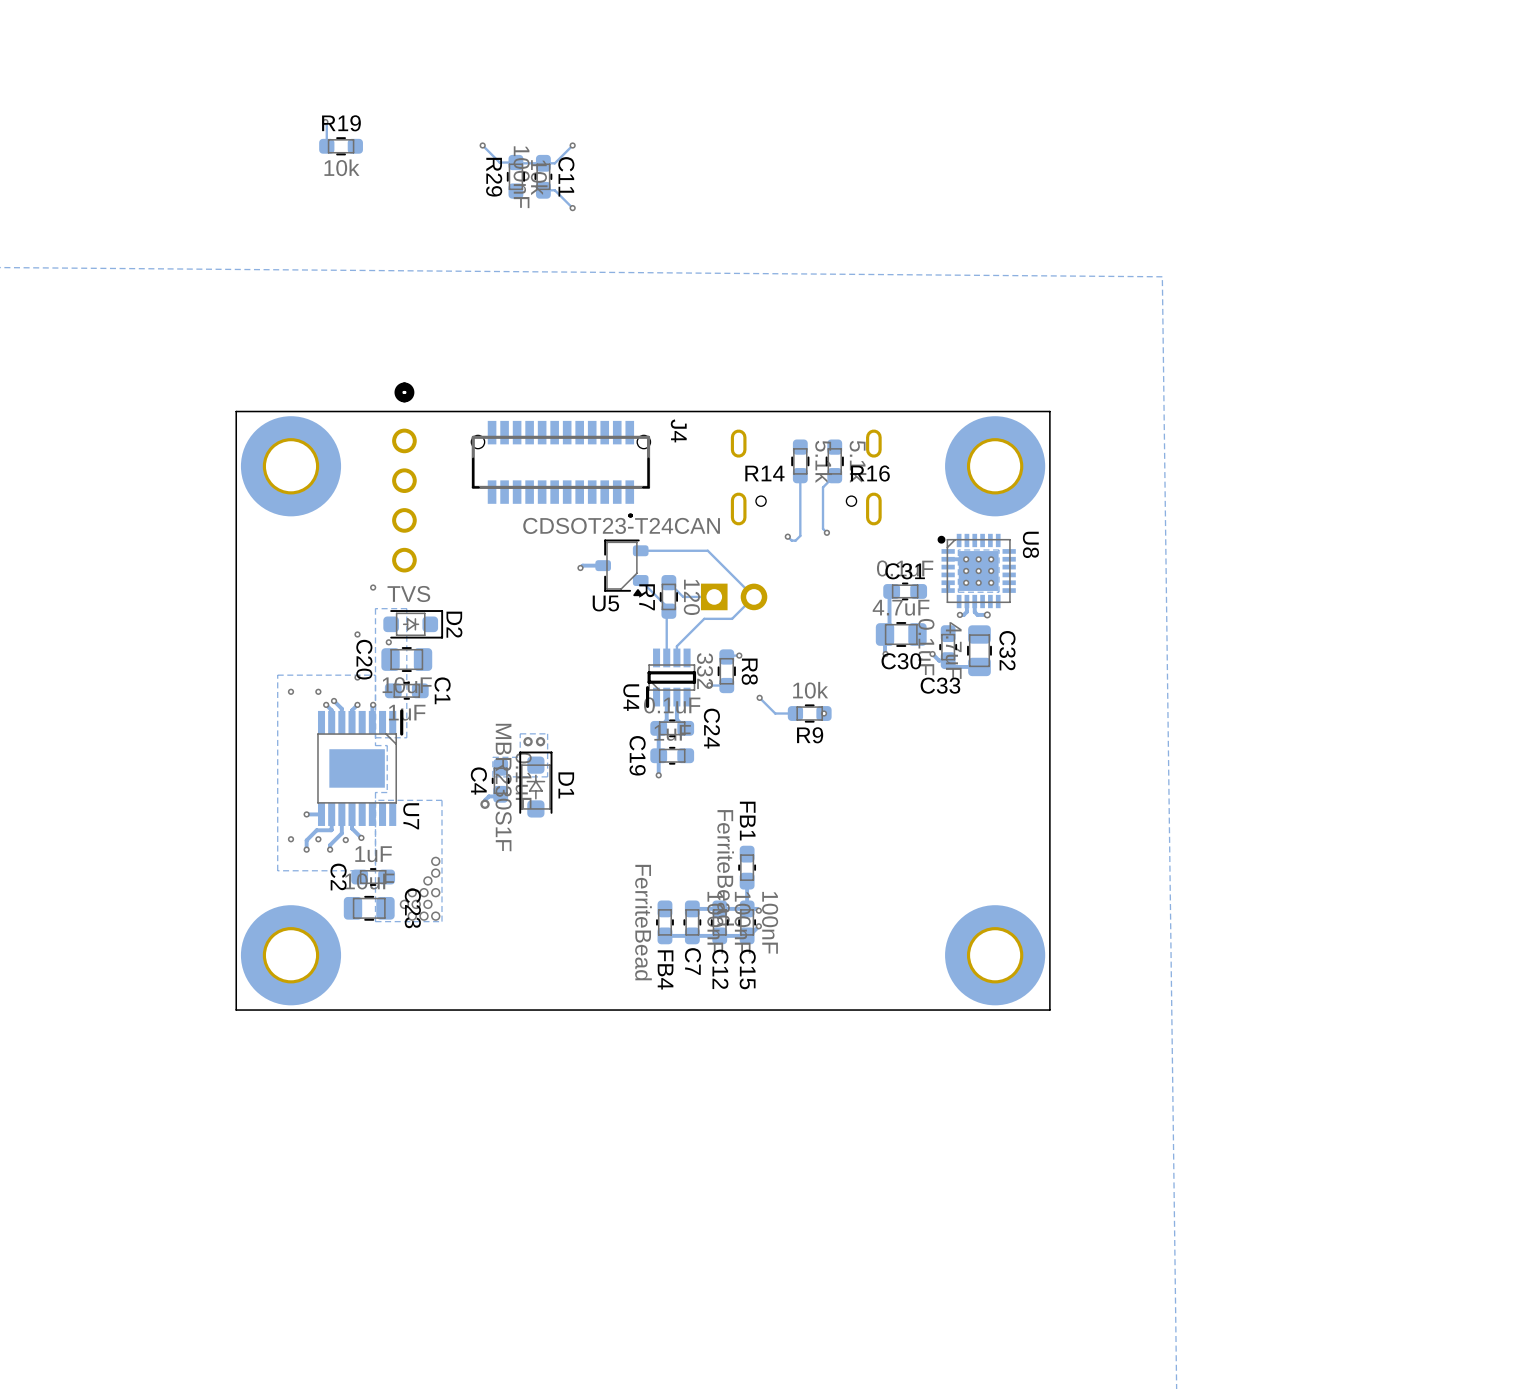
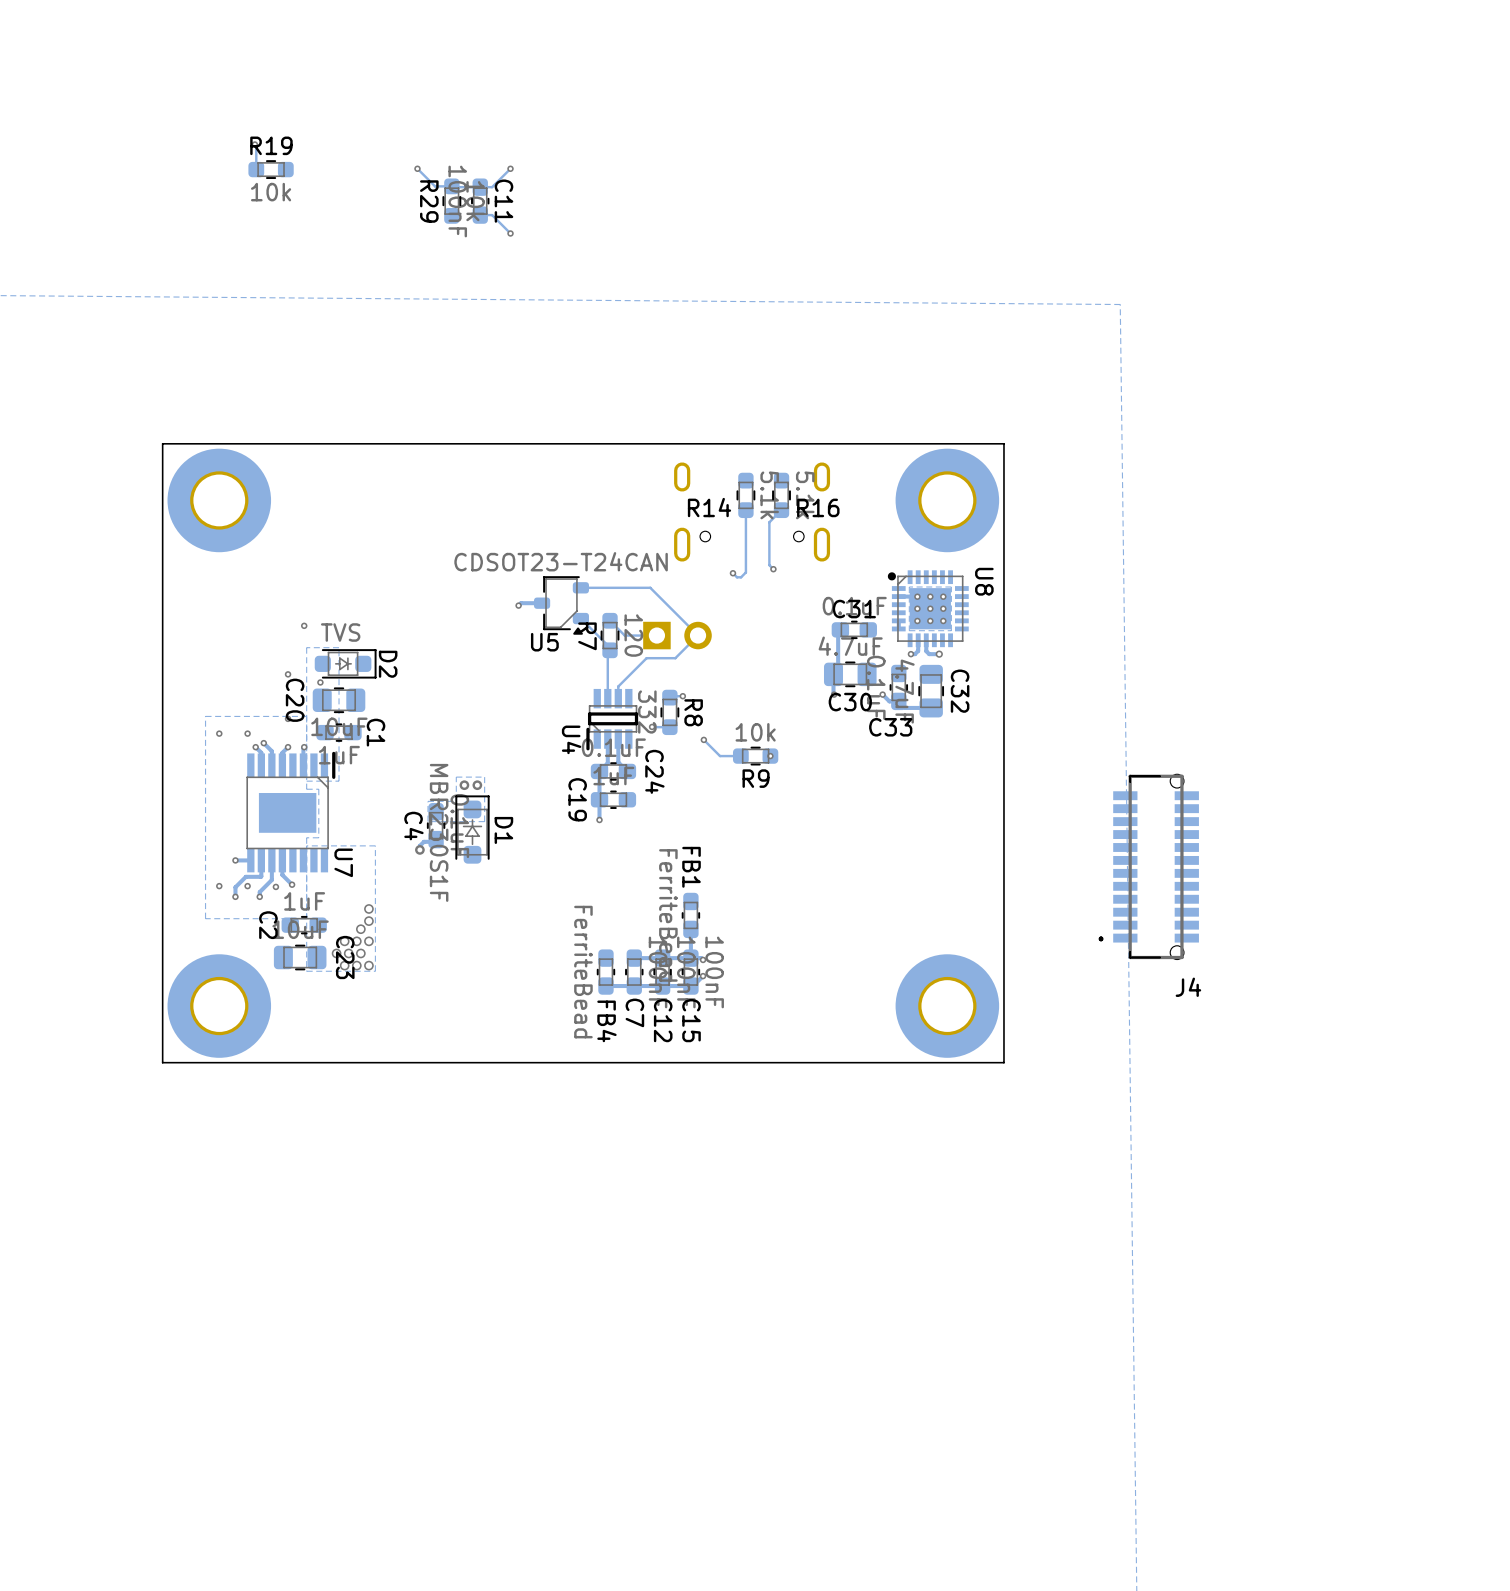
J4 rotation: 0° (560, 469) -> 90° clockwise (1148, 866)
J4 position: (560, 469) -> (1148, 866)
part: (404, 477) -> none

